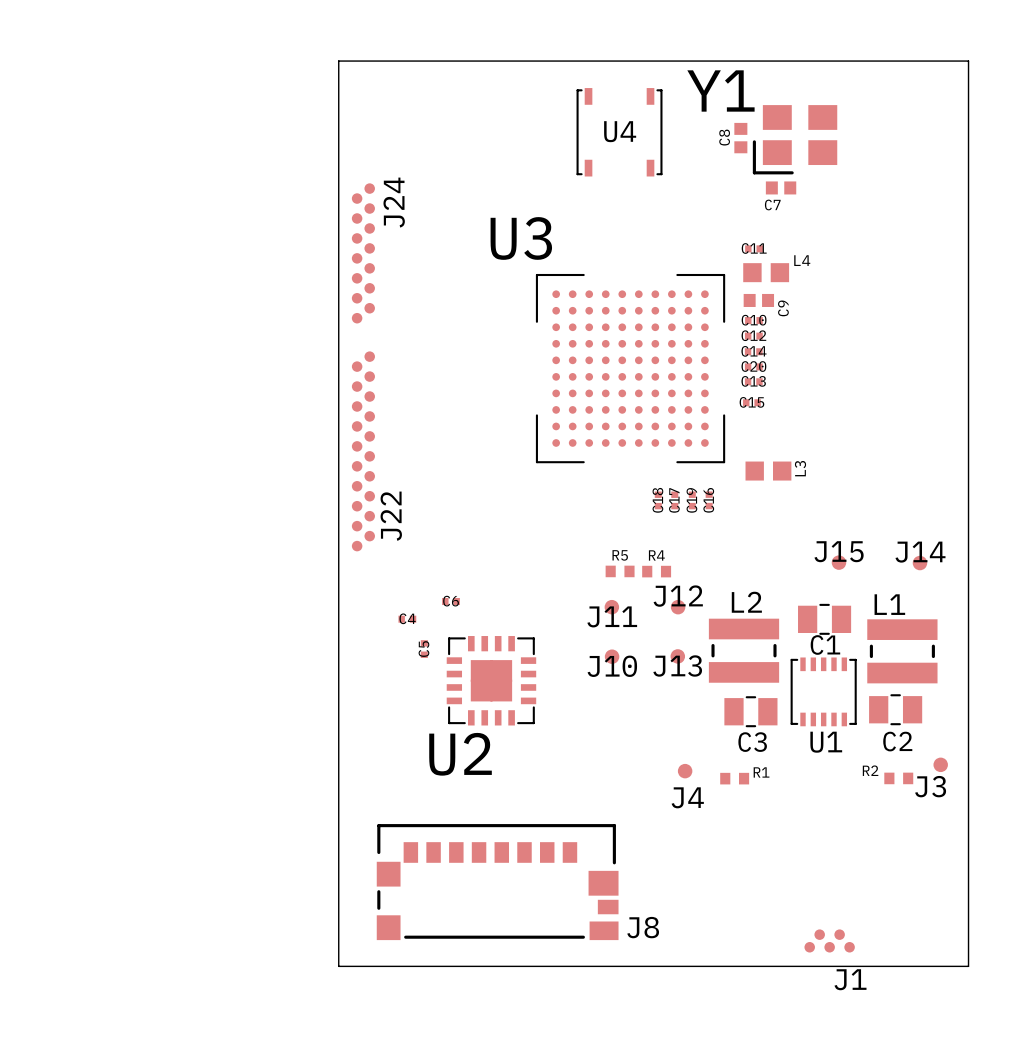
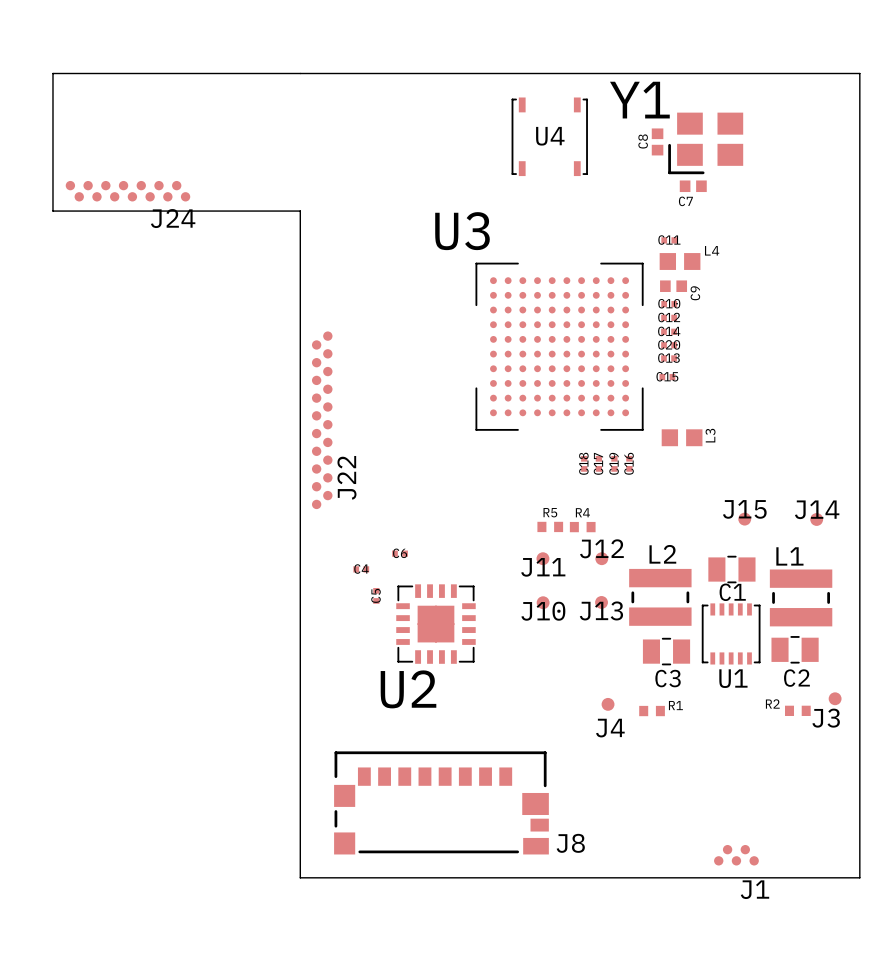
board edge: (338, 61) (338, 215) -> (300, 73) (52, 73) (52, 211) (300, 211)
J24 rotation: 0° (363, 253) -> 90° clockwise (127, 191)
J24 position: (363, 253) -> (127, 191)

